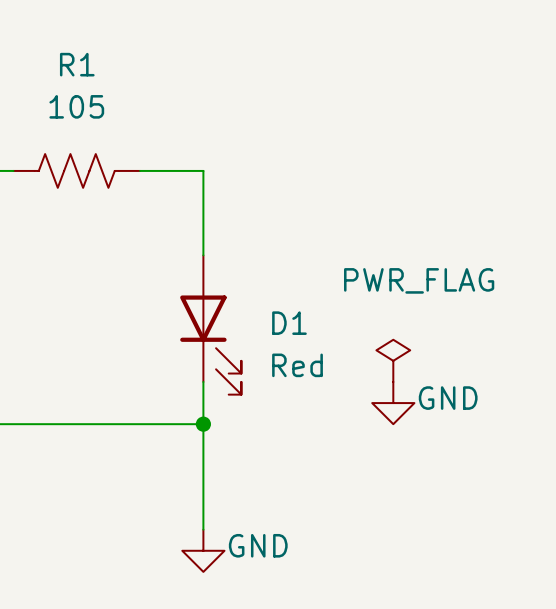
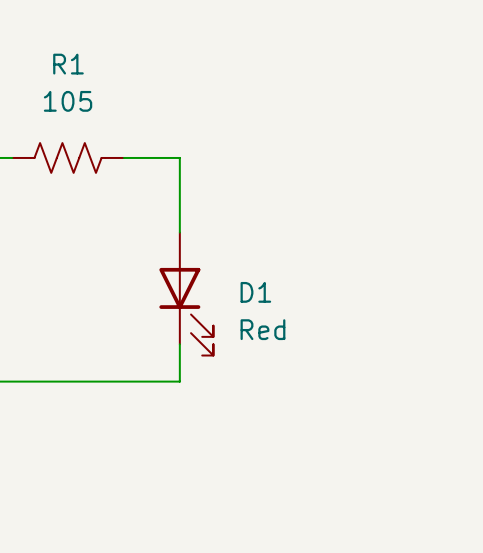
power symbol: PWR_FLAG (393, 360) -> none
power symbol: GND (393, 403) -> none
wire: (203, 424) (203, 529) -> none
junction: (203, 424) -> none
power symbol: GND (203, 550) -> none

